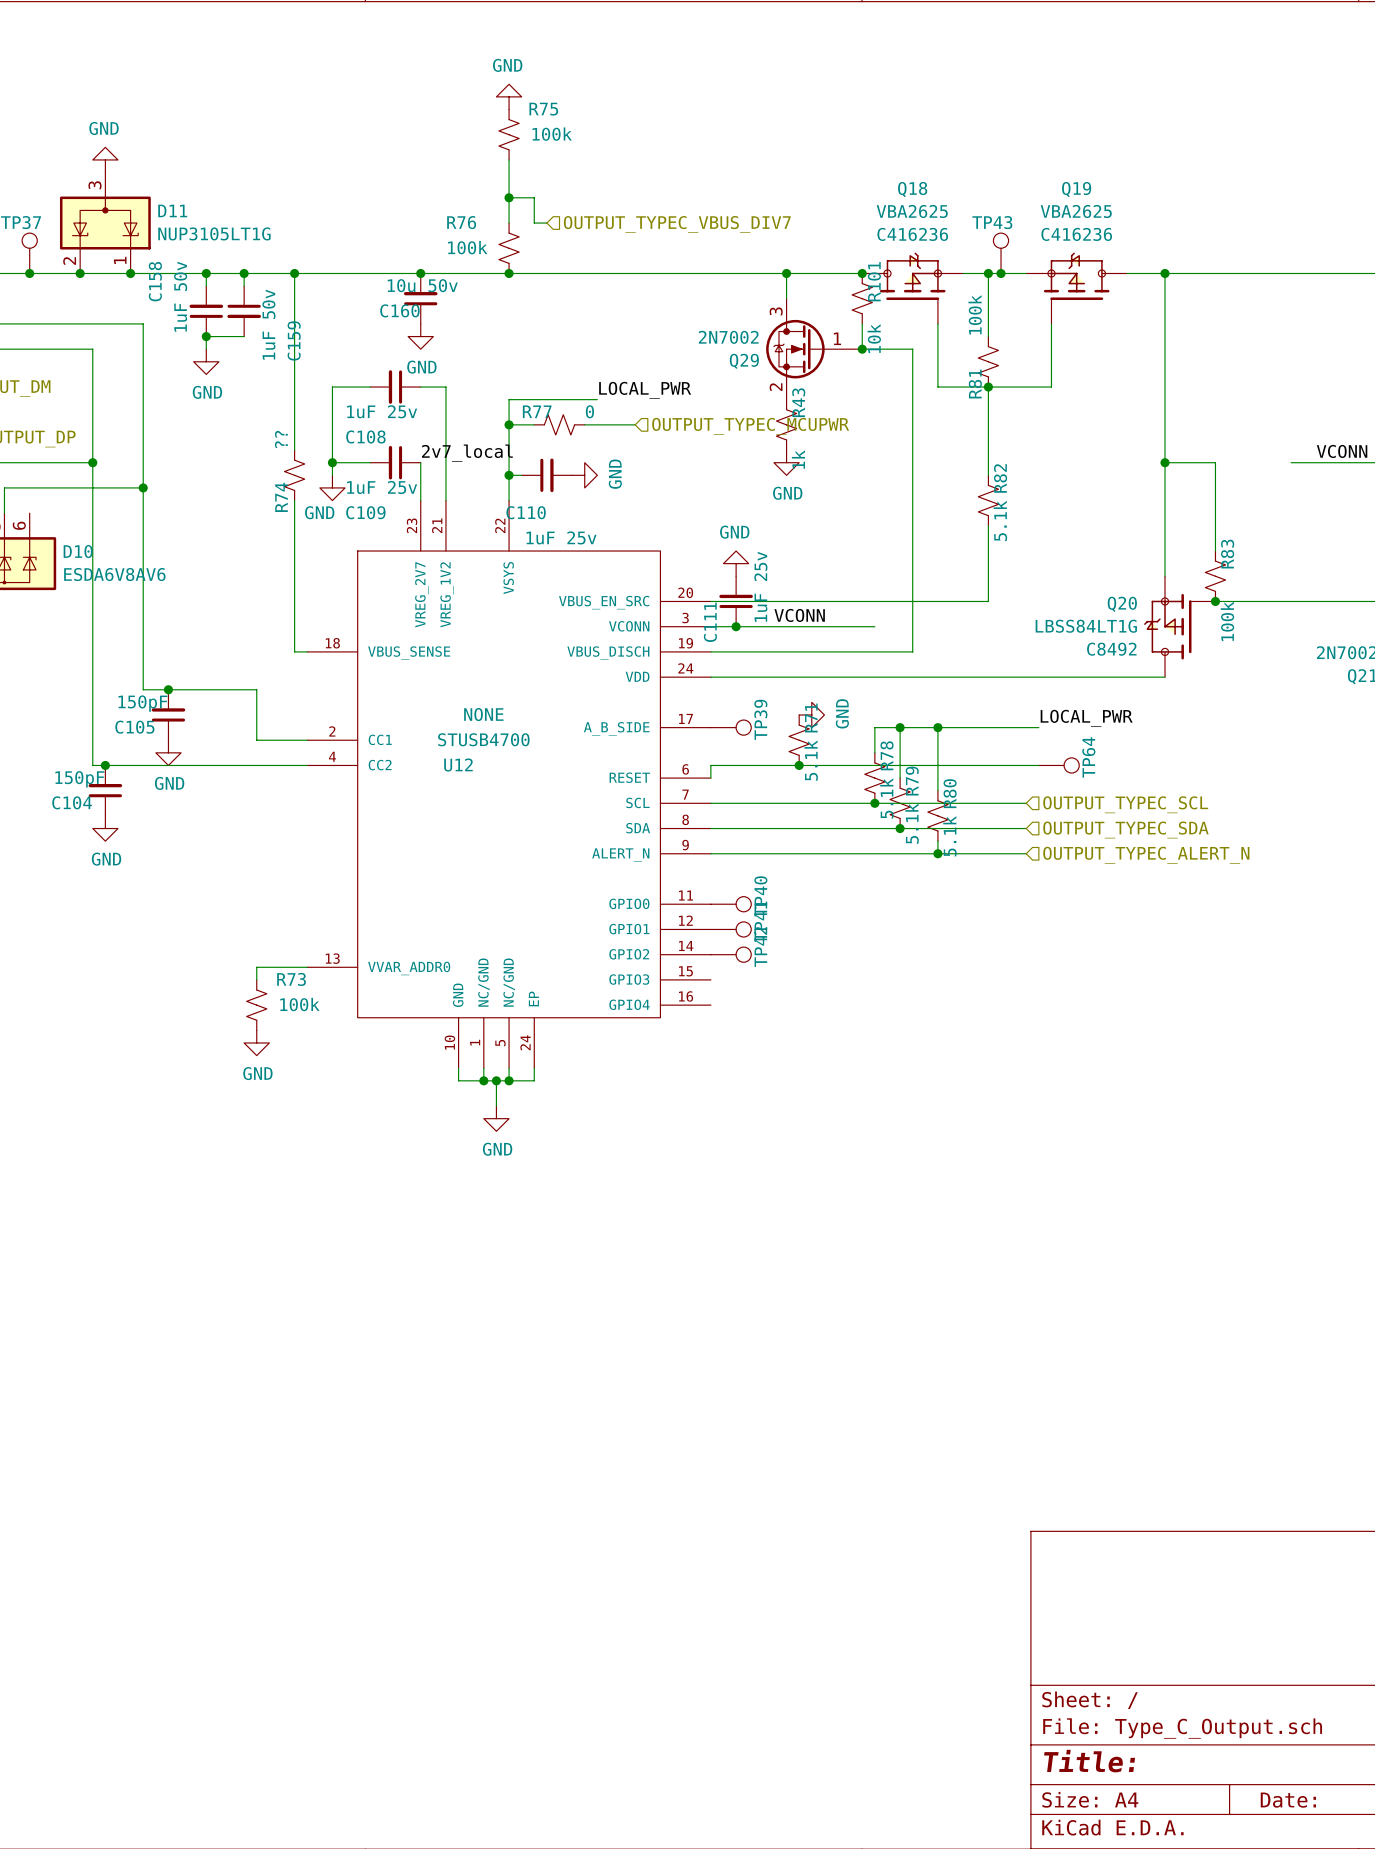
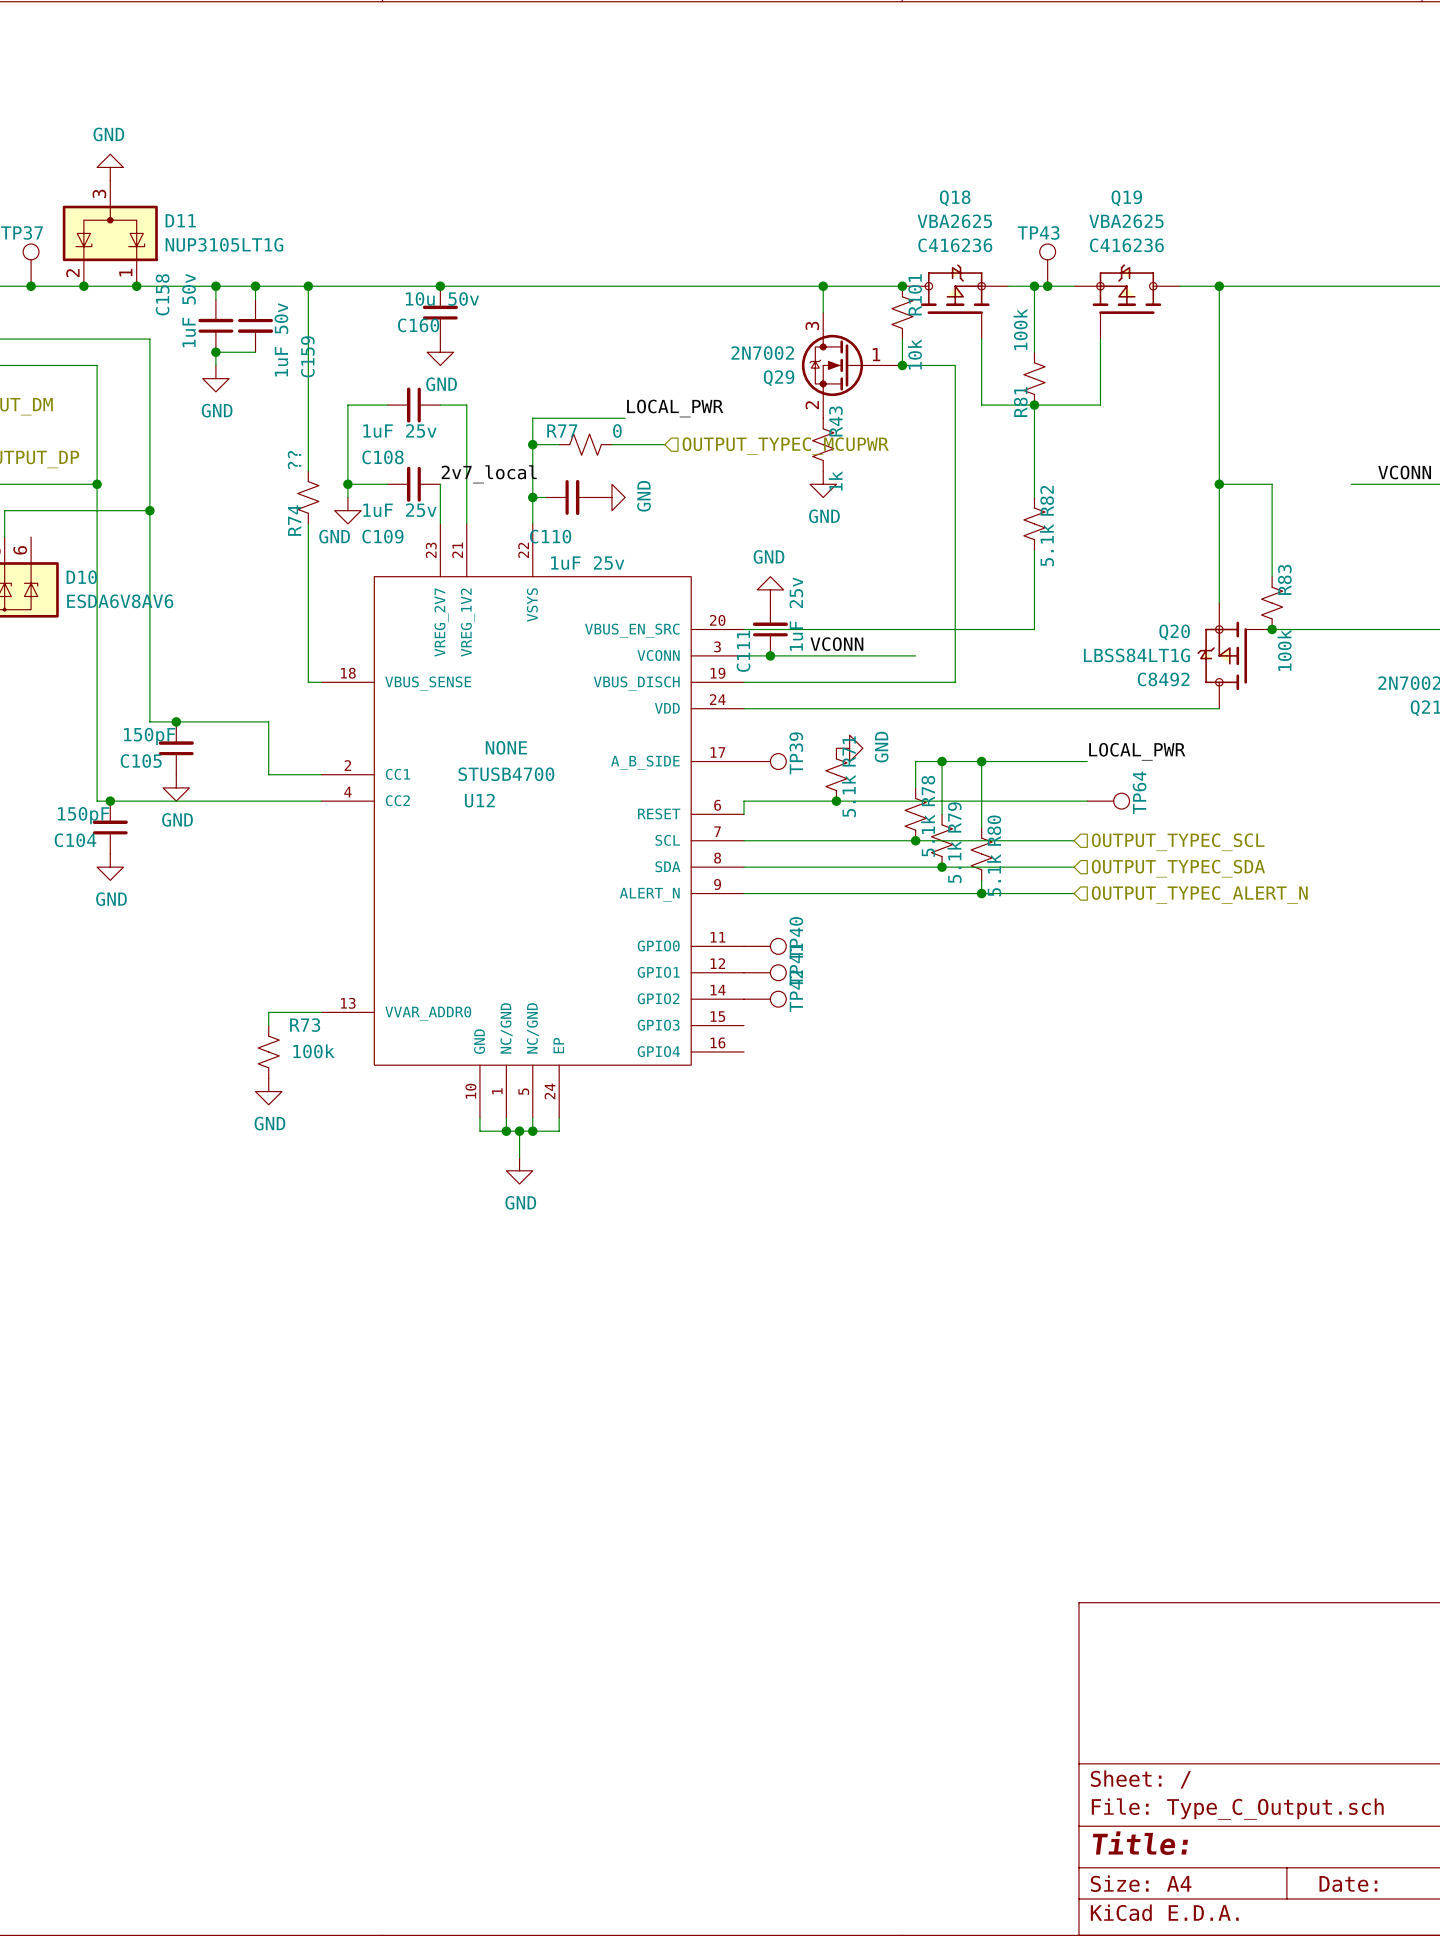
power symbol: GND (509, 96) -> none
R75: 100k (509, 134) -> none
wire: (509, 159) (509, 223) -> none
wire: (509, 197) (534, 197) (534, 223) (546, 223) -> none
junction: (509, 197) -> none
hierarchical label: OUTPUT_TYPEC_VBUS_DIV7 (677, 224) -> none
R76: 100k (509, 248) -> none
junction: (509, 273) -> none

